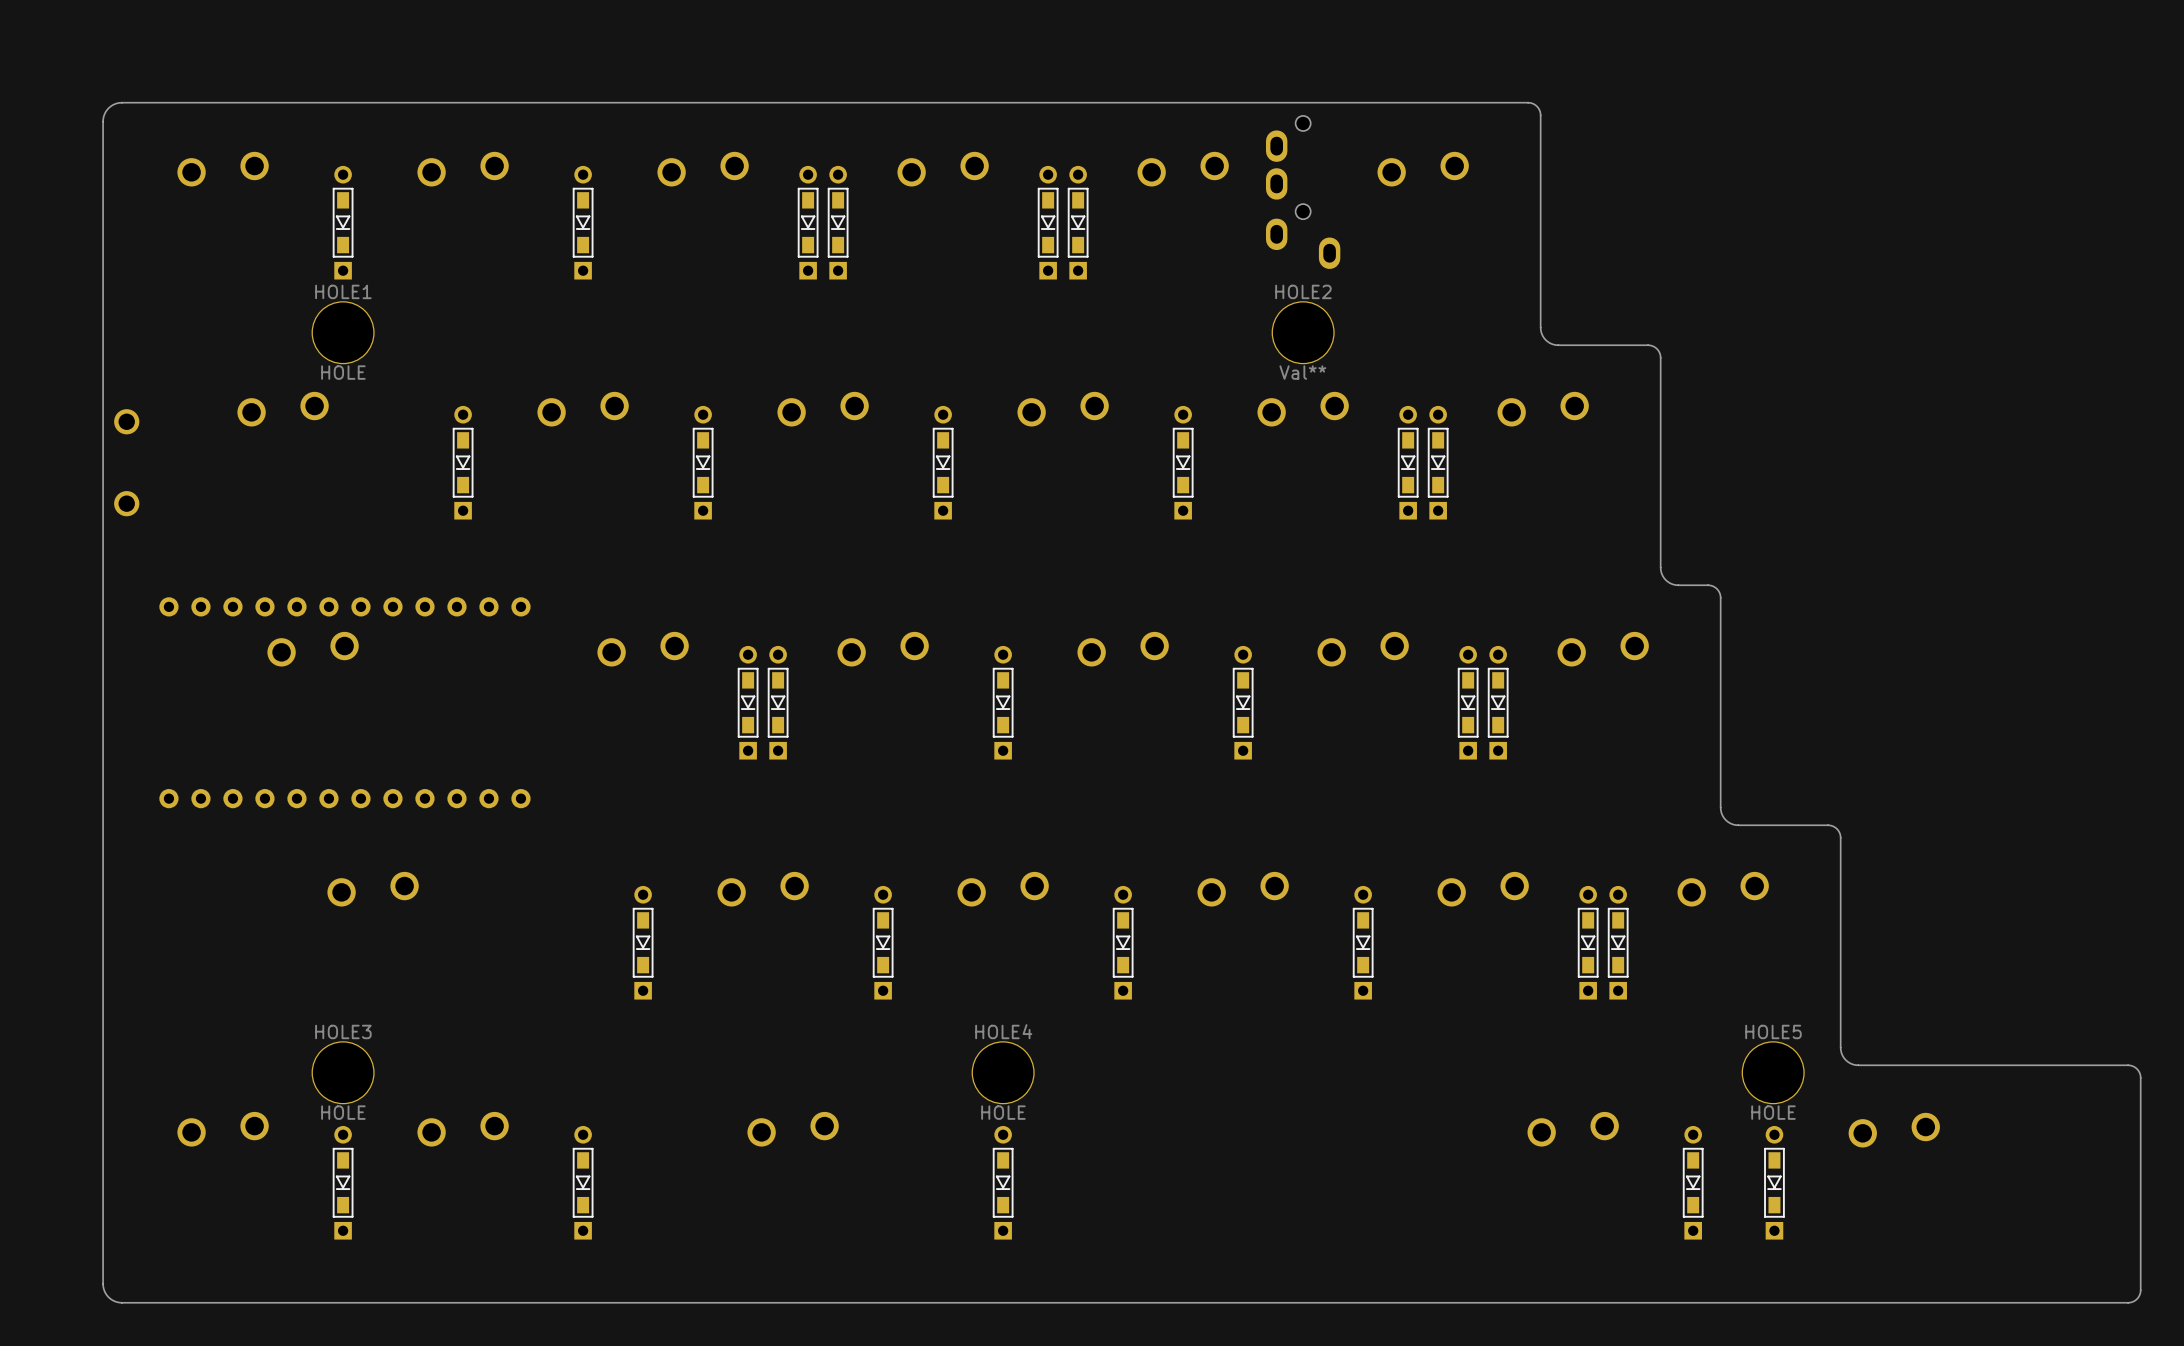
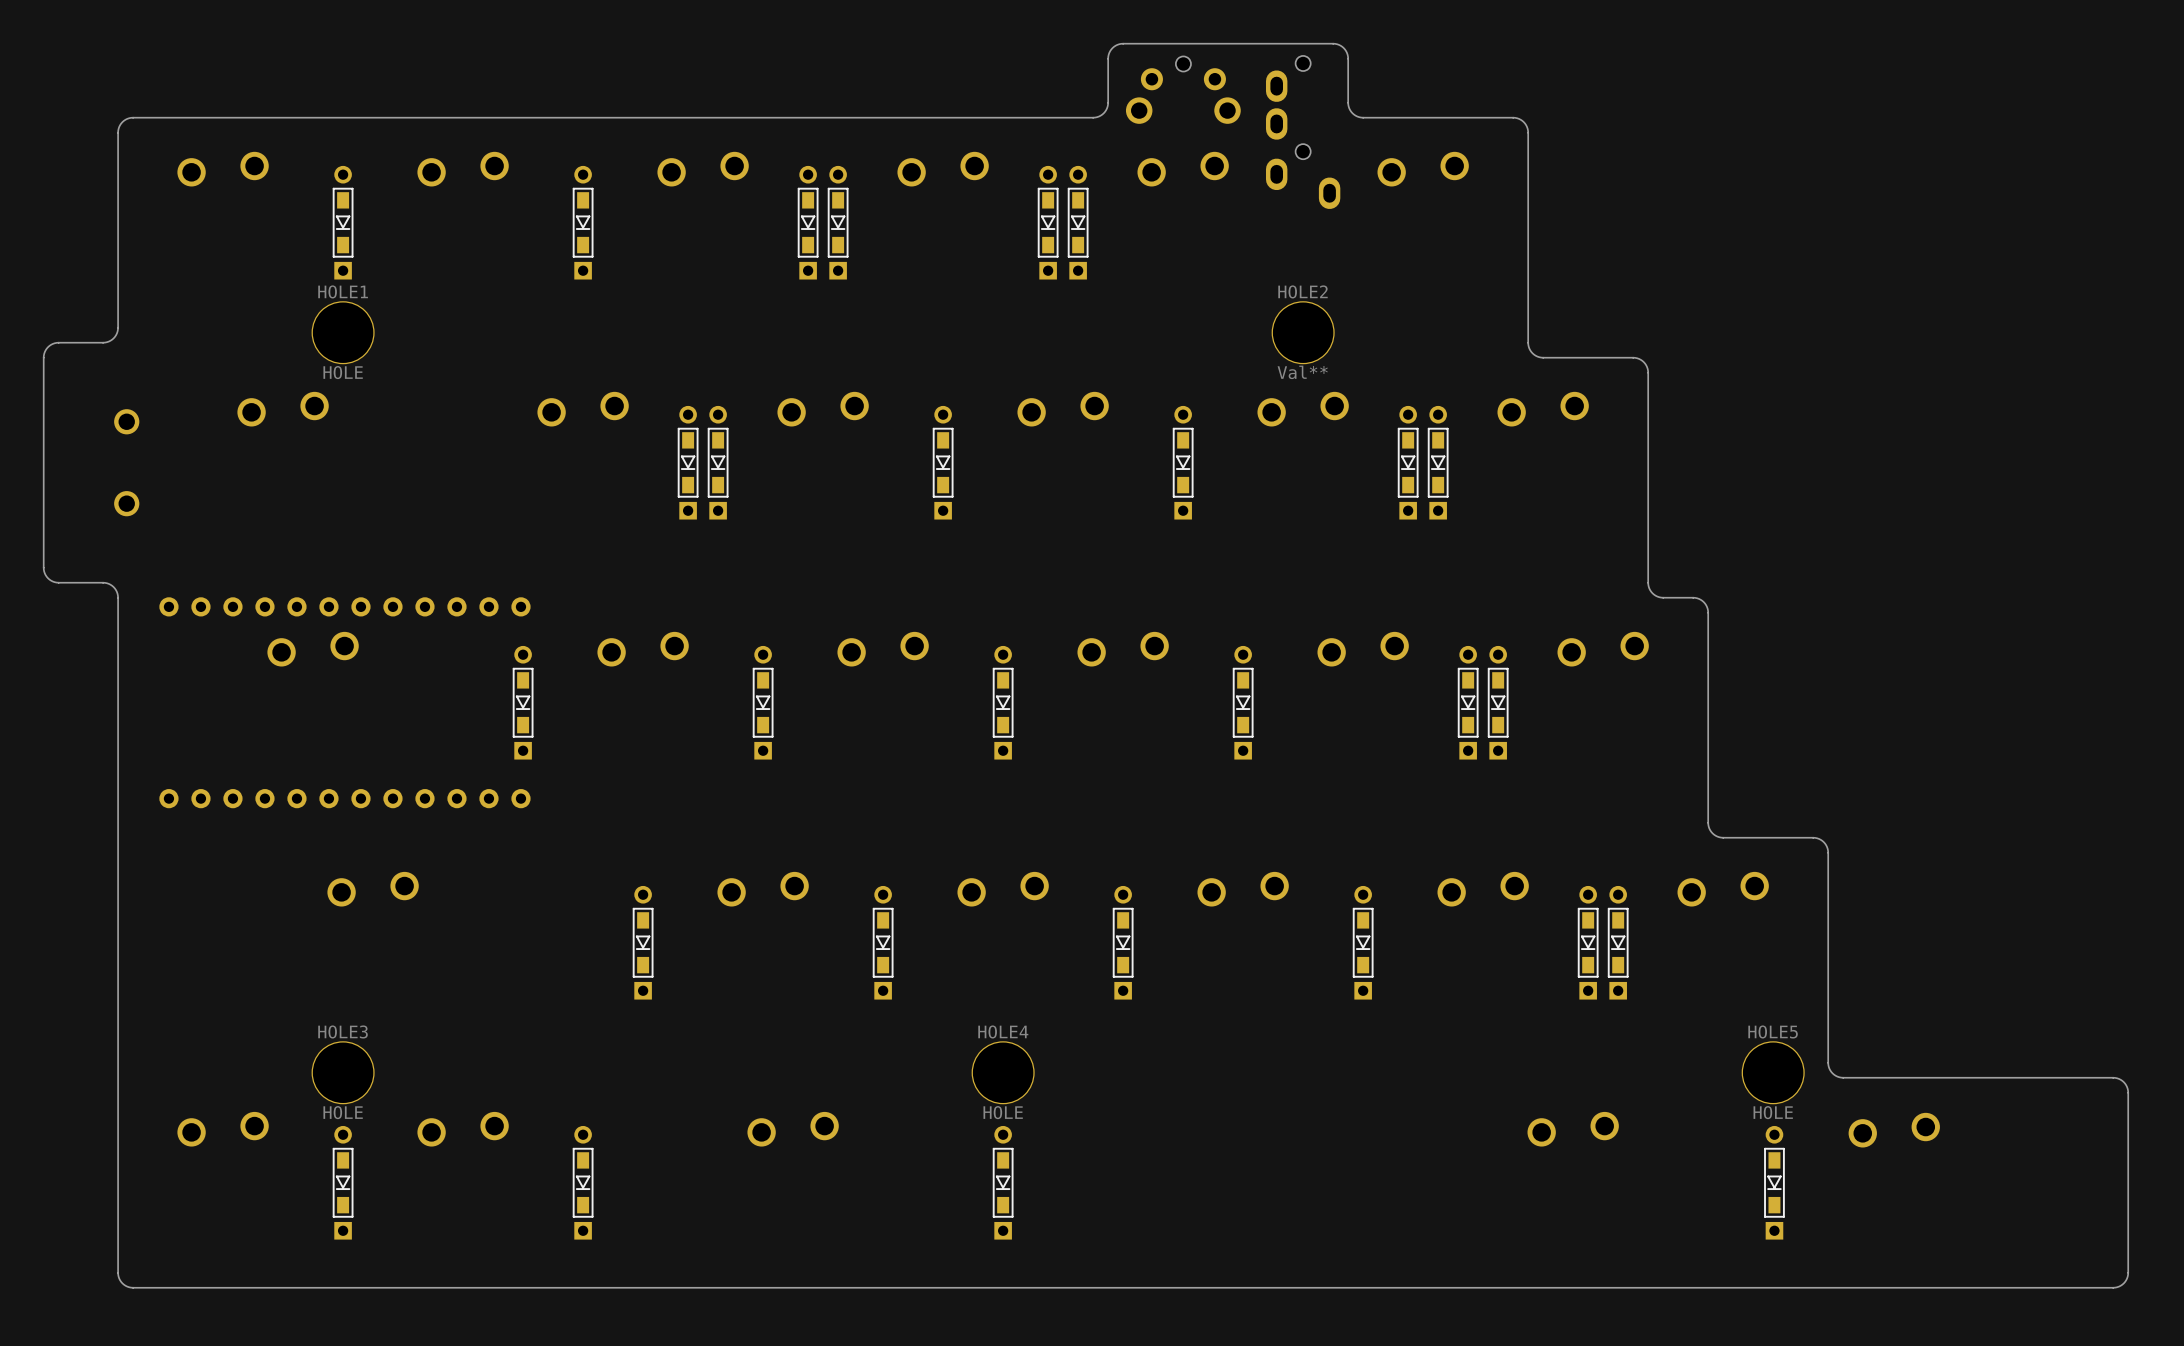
part: none -> (1183, 90)
board edge: (121, 102) (1528, 102) (1534, 104) (1538, 108) (1540, 115) (1540, 327) (1543, 336) (1549, 342) (1555, 345) (1649, 345) (1656, 348) (1660, 354) (1660, 569) (1664, 578) (1671, 583) (1711, 585) (1716, 588) (1720, 594) (1722, 814) (1727, 821) (1736, 825) (1829, 825) (1836, 828) (1840, 834) (1840, 1047) (1843, 1056) (1849, 1062) (1858, 1065) (2128, 1065) (2135, 1067) (2140, 1077) (2140, 1290) (2139, 1296) (2134, 1301) (2128, 1302) (121, 1302) (112, 1300) (105, 1293) (103, 1283) (103, 121) (108, 108) (121, 102) -> (1123, 43) (1115, 45) (1109, 52) (1107, 106) (1102, 114) (1095, 117) (133, 117) (127, 118) (121, 123) (118, 132) (117, 331) (113, 338) (105, 342) (54, 343) (46, 348) (43, 355) (43, 567) (46, 576) (52, 581) (106, 583) (113, 587) (117, 595) (118, 1272) (119, 1278) (123, 1284) (133, 1287) (2113, 1287) (2120, 1285) (2125, 1281) (2128, 1272) (2128, 1092) (2127, 1087) (2122, 1080) (2113, 1077) (1843, 1077) (1835, 1075) (1830, 1070) (1828, 1062) (1827, 848) (1822, 840) (1815, 837) (1721, 837) (1714, 834) (1709, 828) (1707, 608) (1703, 602) (1697, 598) (1657, 596) (1651, 591) (1648, 584) (1647, 368) (1642, 360) (1635, 357) (1541, 357) (1534, 354) (1530, 350) (1528, 342) (1528, 132) (1525, 123) (1518, 118) (1513, 117) (1357, 116) (1351, 111) (1348, 104) (1347, 54) (1342, 46) (1335, 43) (1123, 43)
part position: (1303, 192) -> (1303, 132)
part: (463, 462) -> none
part: none -> (688, 462)
part: (703, 462) -> none
part: none -> (718, 462)
part: none -> (523, 702)
part: (748, 702) -> none
part: none -> (763, 702)
part: (778, 702) -> none
part: (1693, 1182) -> none

